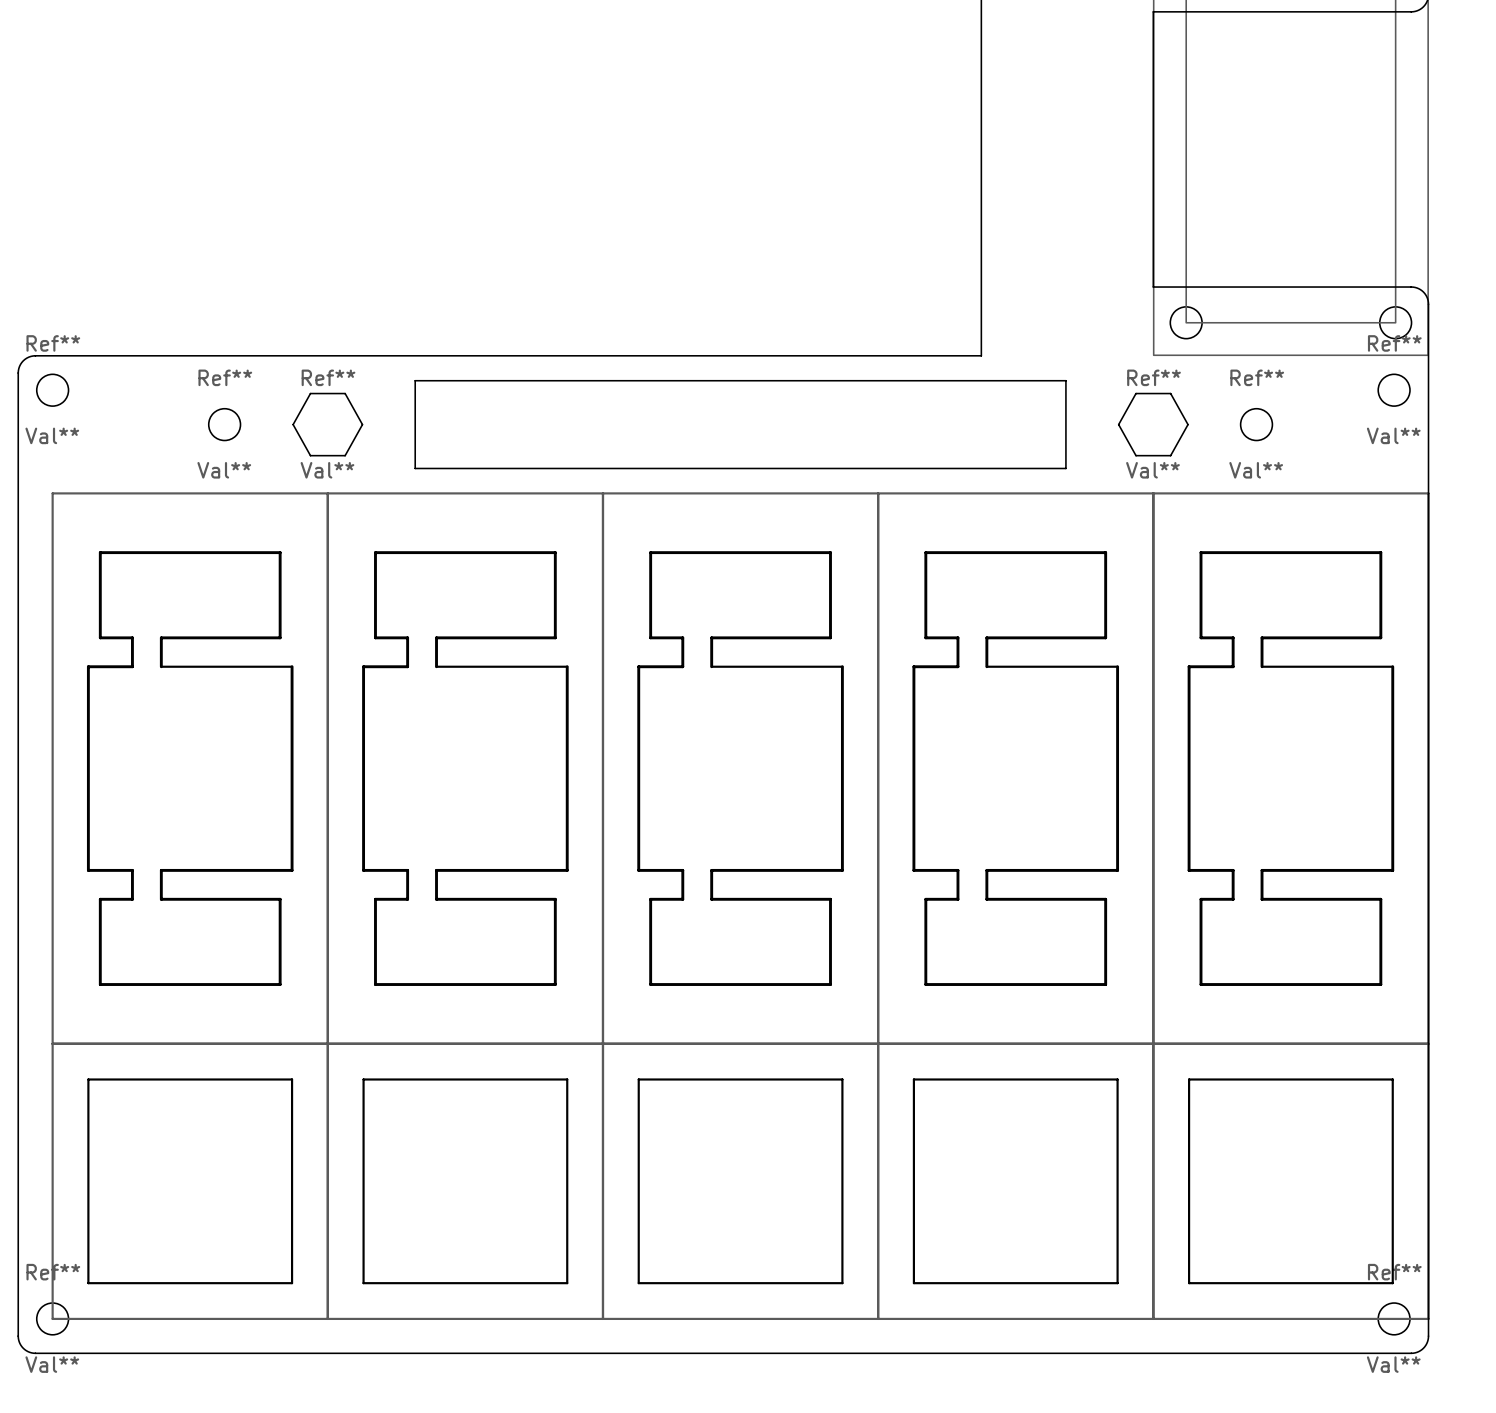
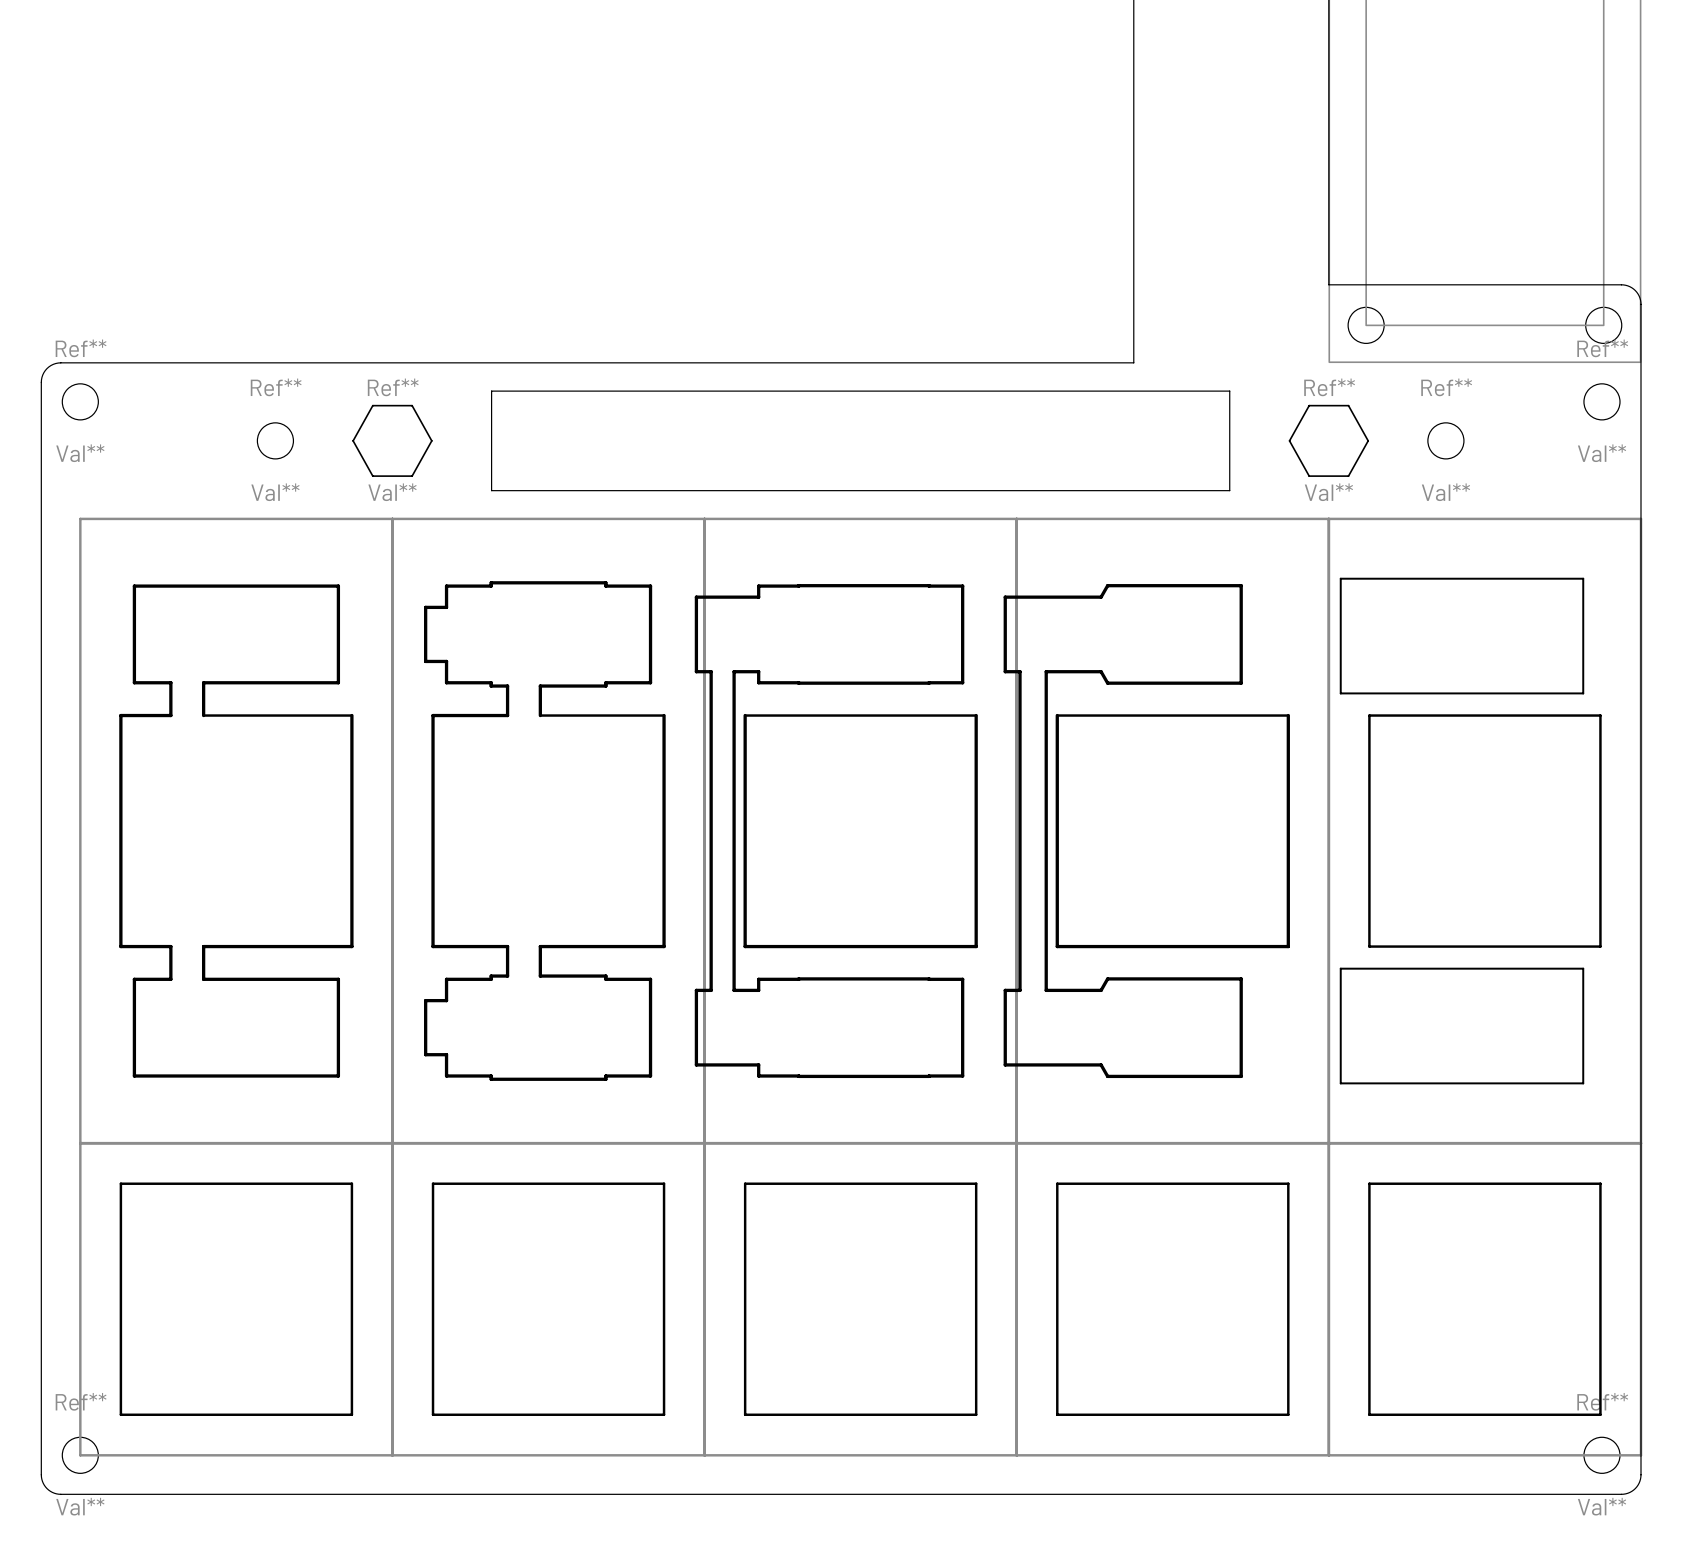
drawing shape: [326, 492, 605, 1045] -> [391, 517, 706, 1145]
drawing shape: [601, 492, 880, 1045] -> [694, 517, 1018, 1145]
drawing shape: [877, 492, 1155, 1045] -> [1003, 517, 1331, 1145]
drawing shape: [1152, 492, 1430, 1045] -> [1327, 517, 1643, 1145]

